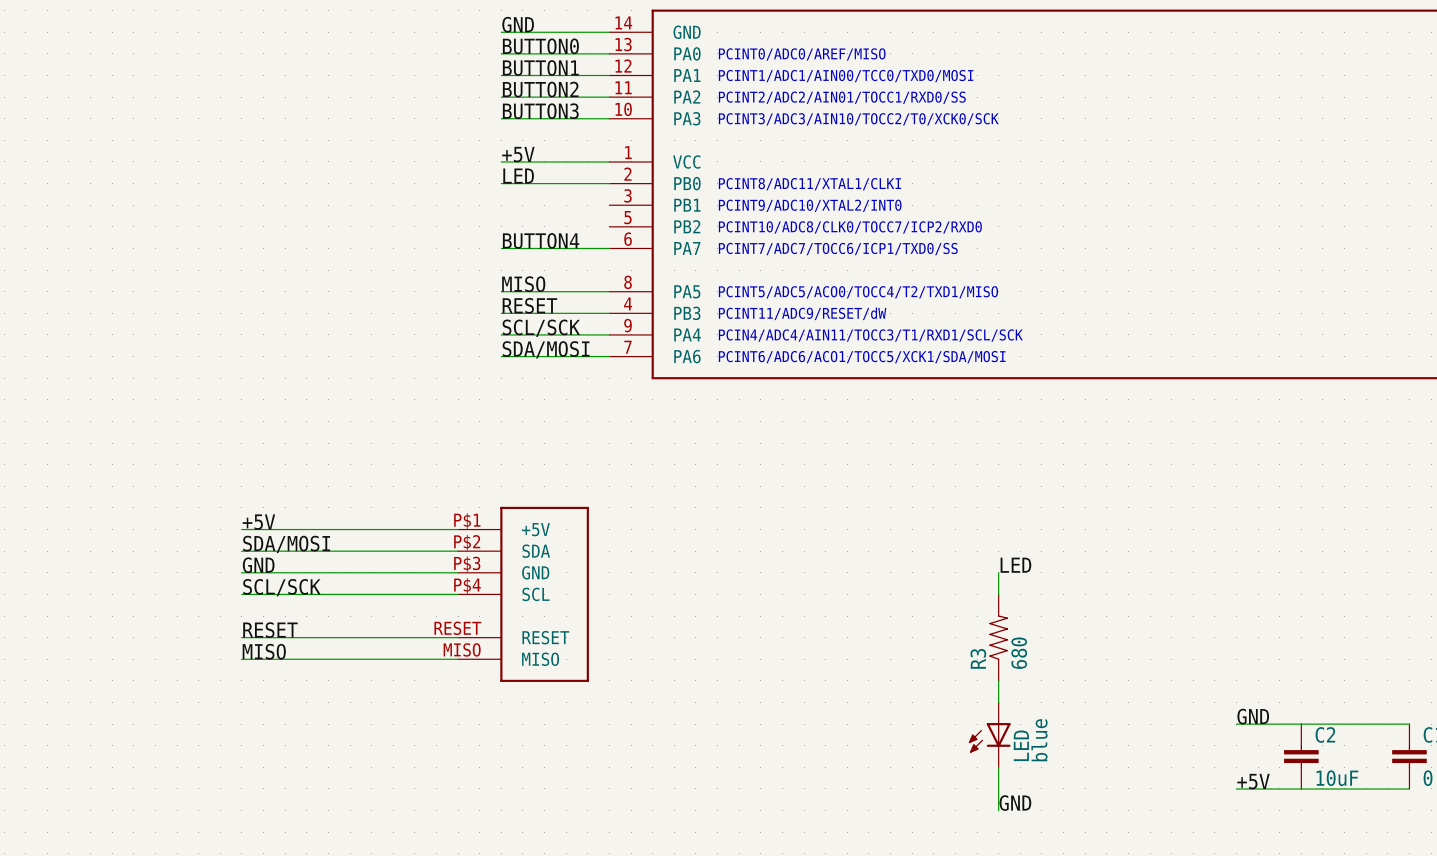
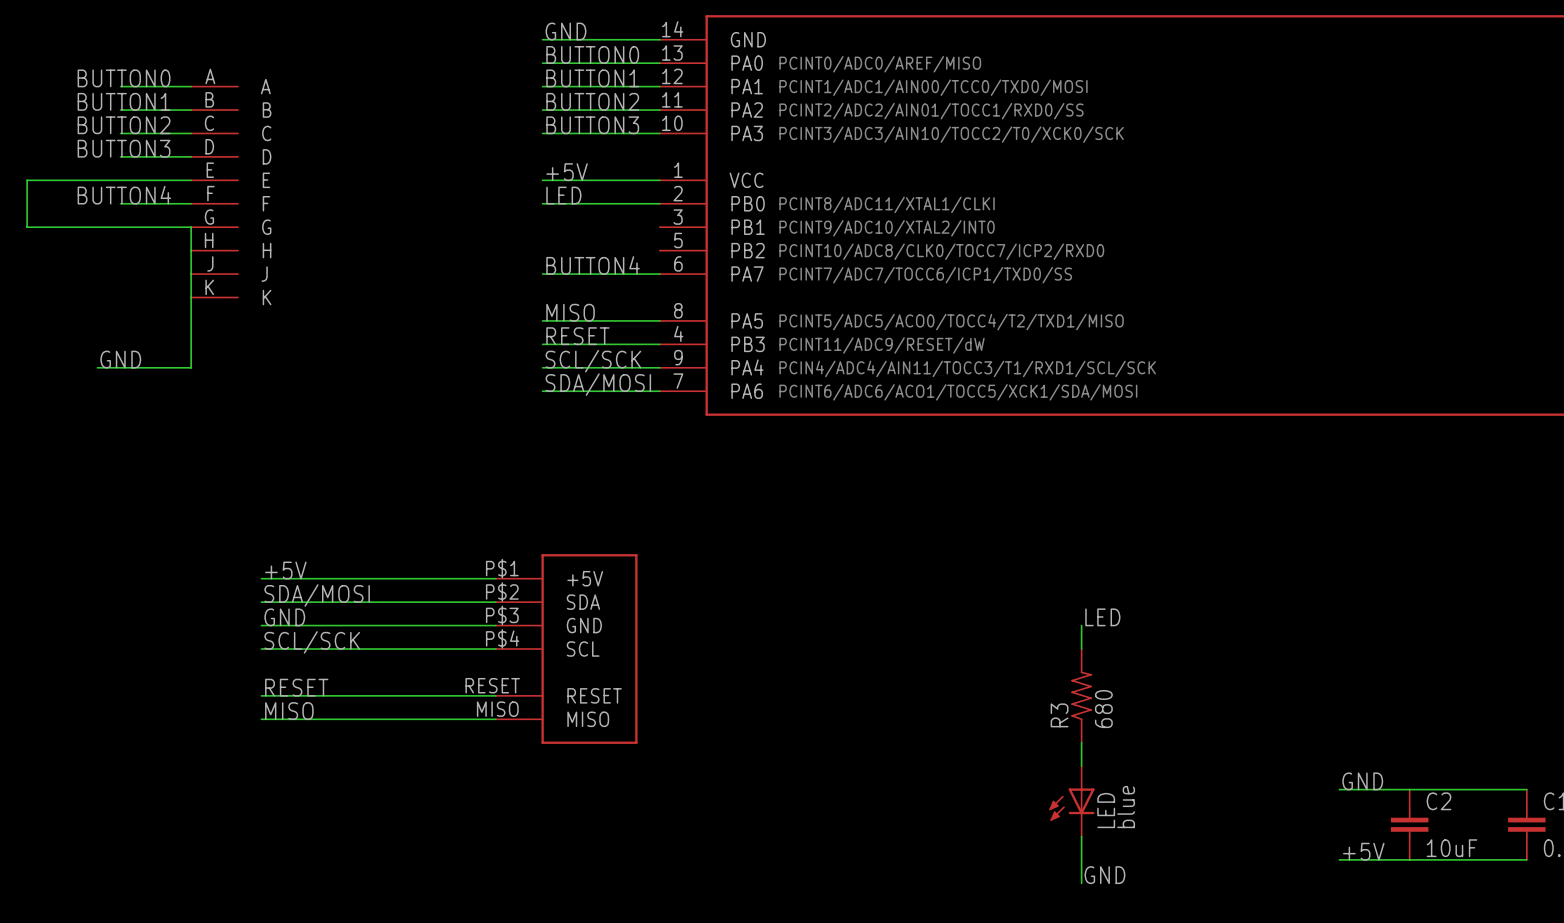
label: none -> BUTTON0 (124, 78)
wire: none -> (120, 86) (191, 86)
label: none -> BUTTON1 (124, 101)
wire: none -> (120, 110) (191, 110)
label: none -> BUTTON2 (124, 125)
wire: none -> (120, 133) (191, 133)
label: none -> BUTTON3 (124, 148)
wire: none -> (120, 156) (191, 156)
wire: none -> (191, 180) (27, 180) (27, 227) (191, 227) (191, 367) (97, 367)
part: none -> (214, 192)
label: none -> BUTTON4 (124, 195)
wire: none -> (120, 203) (191, 203)
label: none -> GND (120, 359)

